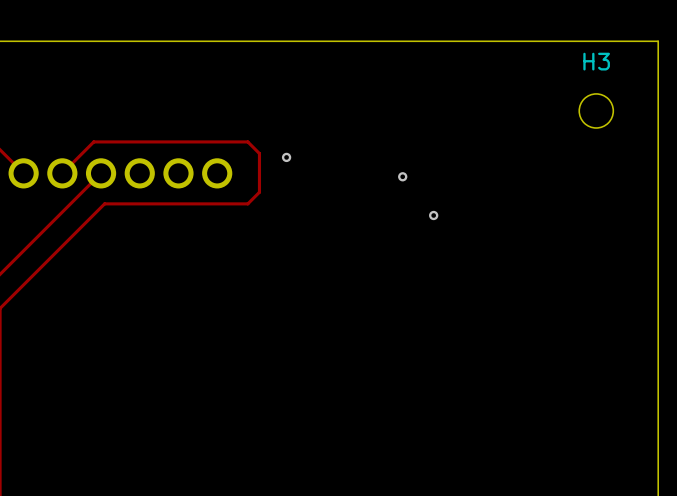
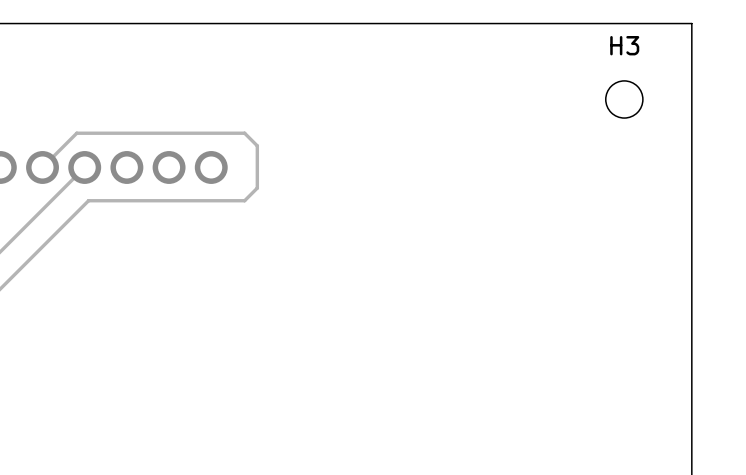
via: (286, 157) -> none
via: (402, 176) -> none
via: (433, 215) -> none

